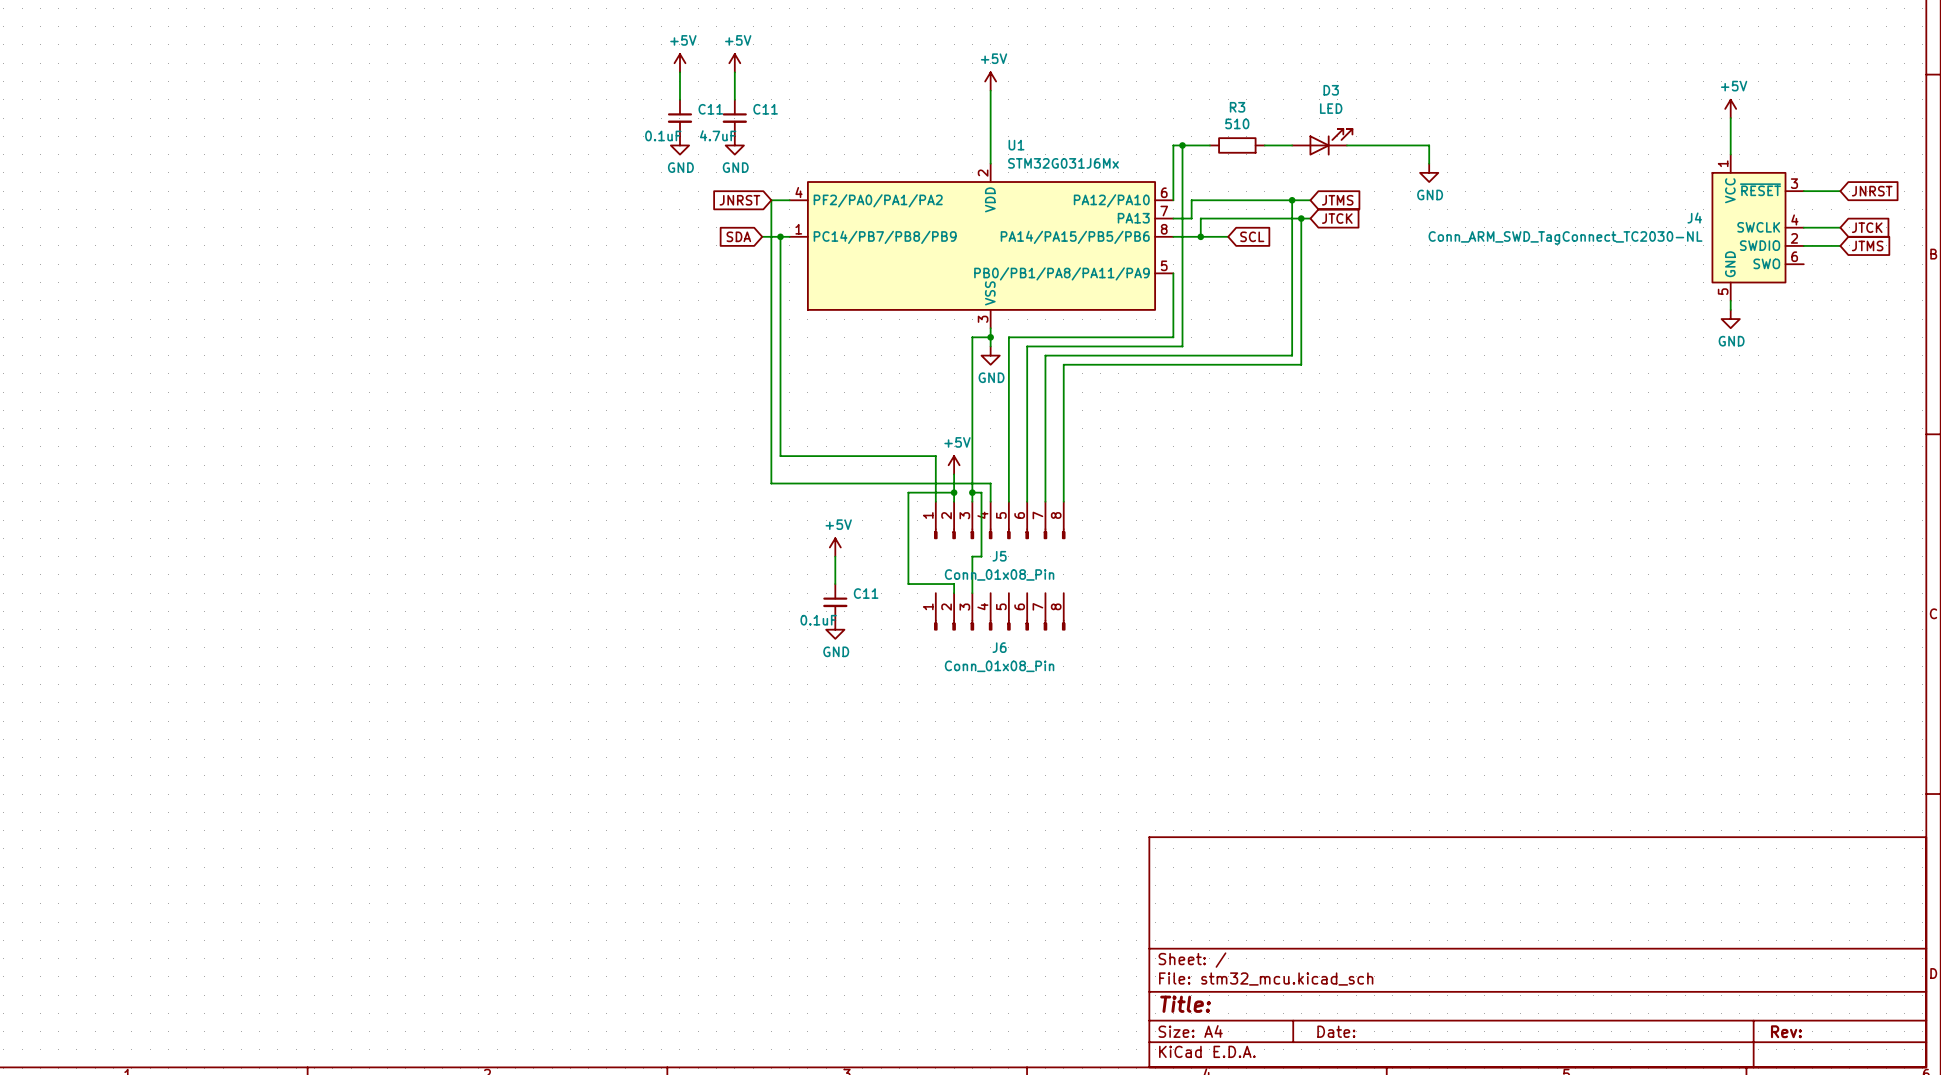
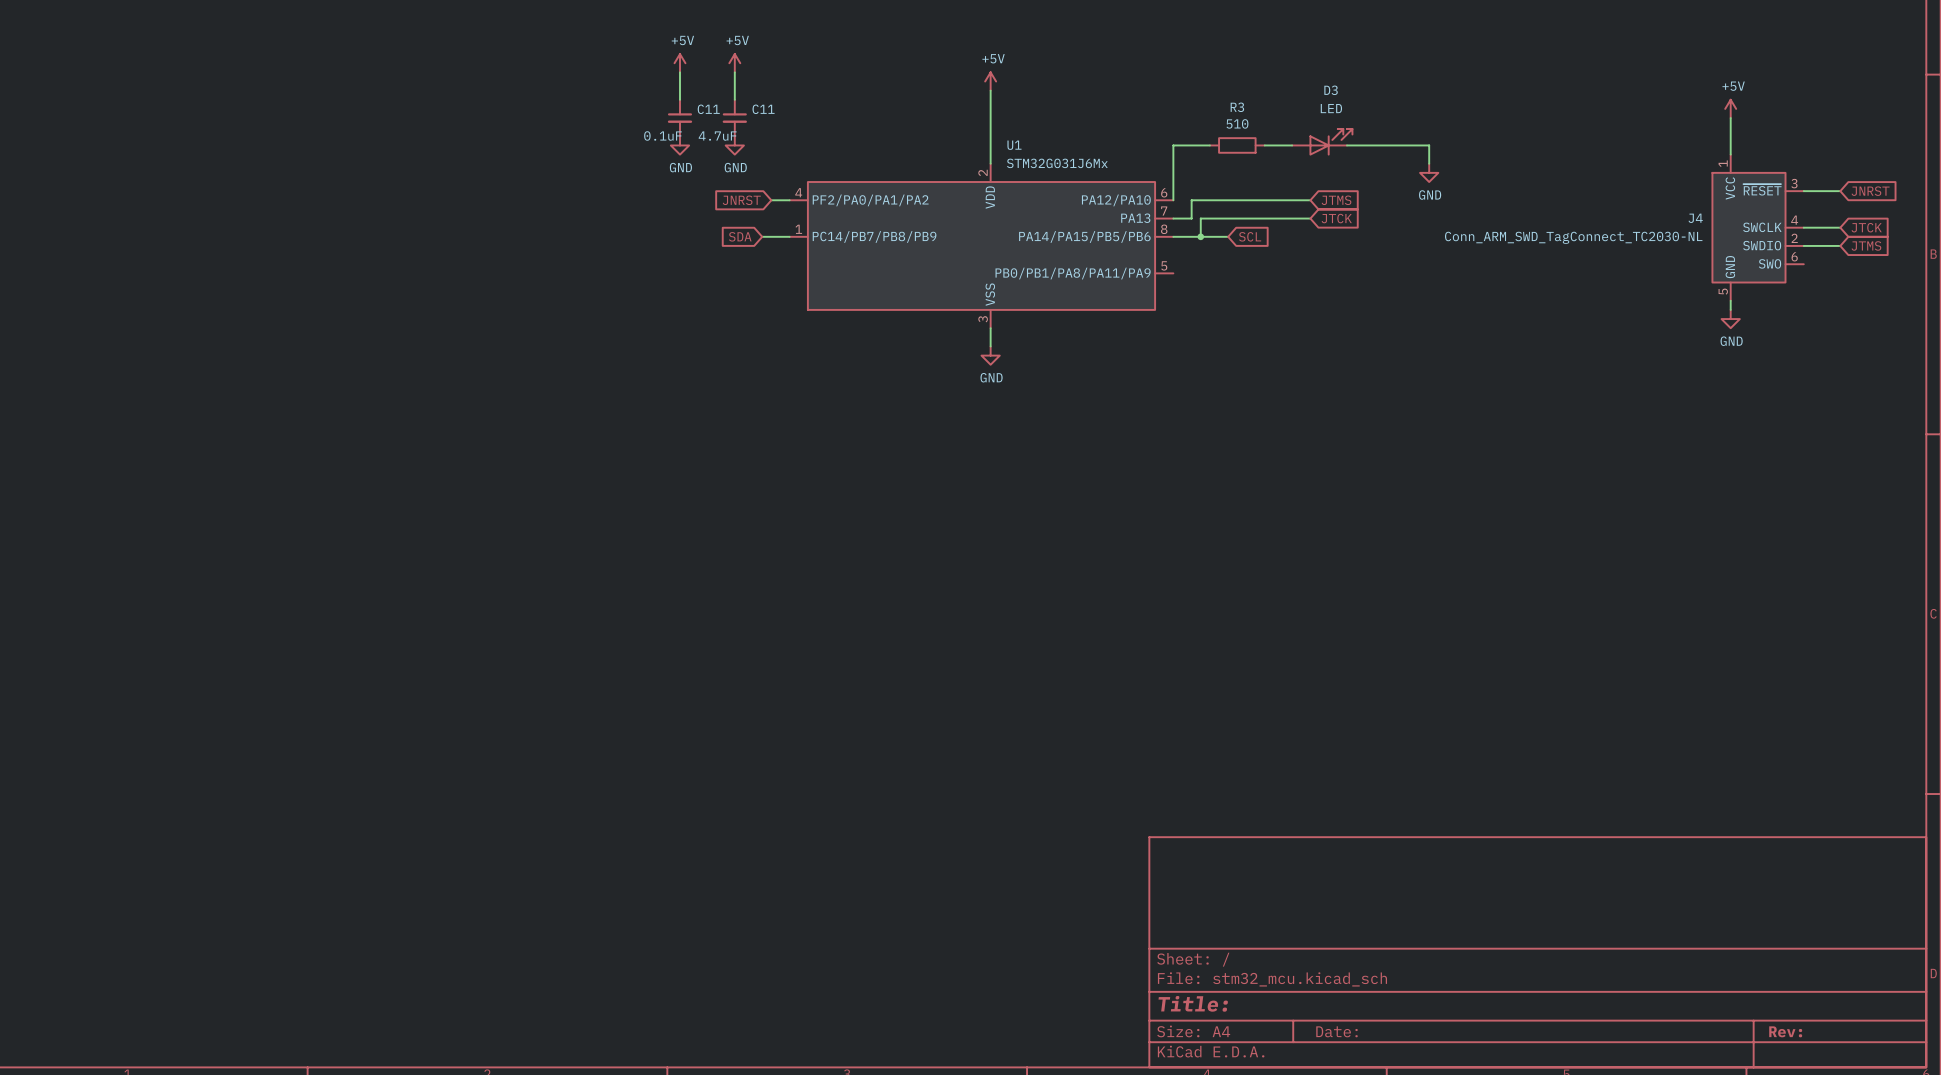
wire: (1182, 145) (1182, 346) (1027, 346) (1027, 501) -> none
junction: (1182, 145) -> none
wire: (771, 200) (771, 483) (990, 483) (990, 501) -> none
wire: (1292, 200) (1292, 355) (1045, 355) (1045, 501) -> none
junction: (1292, 200) -> none
wire: (1301, 218) (1301, 364) (1063, 364) (1063, 501) -> none
junction: (1301, 218) -> none
wire: (780, 236) (780, 456) (935, 456) (935, 501) -> none
junction: (780, 236) -> none
wire: (1173, 273) (1173, 337) (1008, 337) (1008, 501) -> none
wire: (990, 337) (972, 337) (972, 501) -> none
junction: (990, 337) -> none
power symbol: +5V (954, 465) -> none
wire: (954, 474) (954, 501) -> none
wire: (954, 492) (908, 492) (908, 584) (954, 584) (954, 593) -> none
junction: (954, 492) -> none
wire: (972, 492) (981, 492) (981, 556) (972, 556) (972, 593) -> none
junction: (972, 492) -> none
J5: Conn_01x08_Pin (999, 520) -> none
power symbol: +5V (835, 547) -> none
wire: (835, 556) (835, 584) -> none
C11: 0.1uF (835, 602) -> none
J6: Conn_01x08_Pin (999, 611) -> none
power symbol: GND (835, 629) -> none

